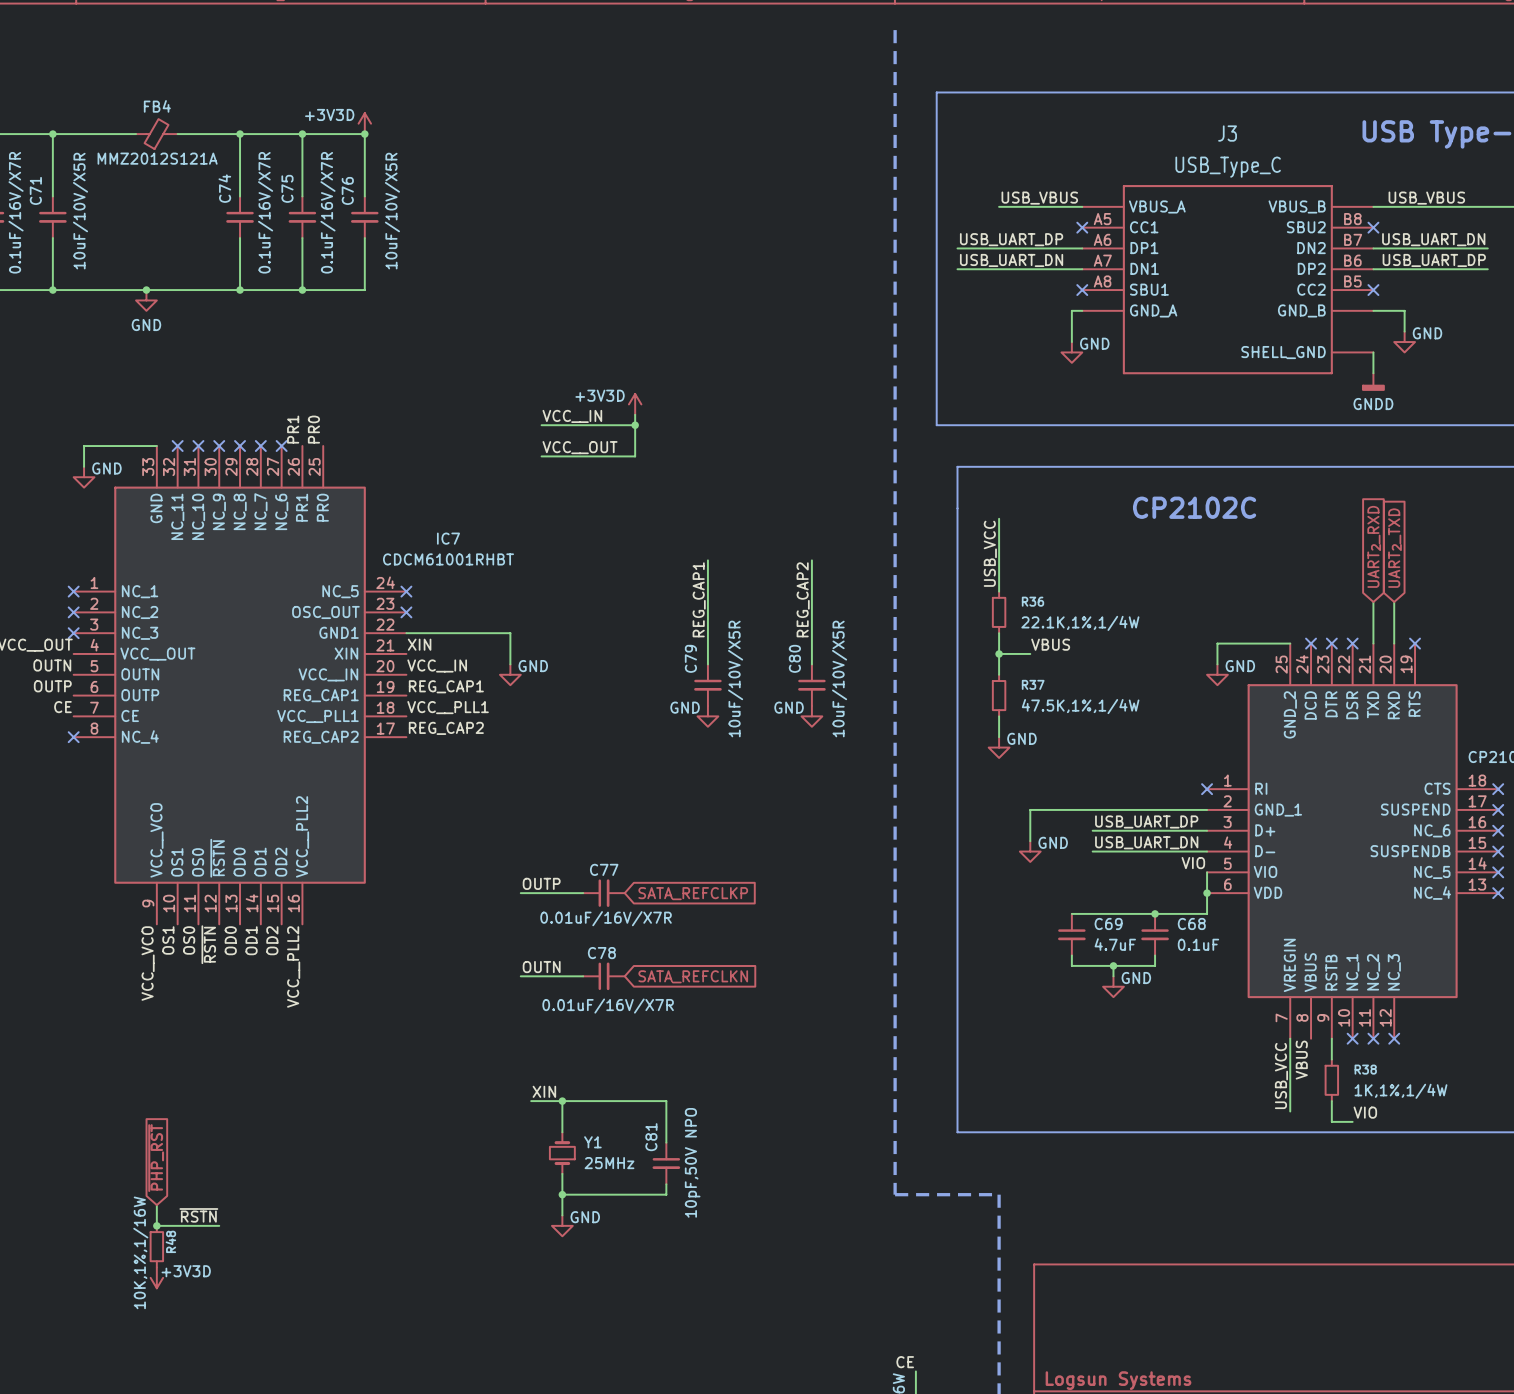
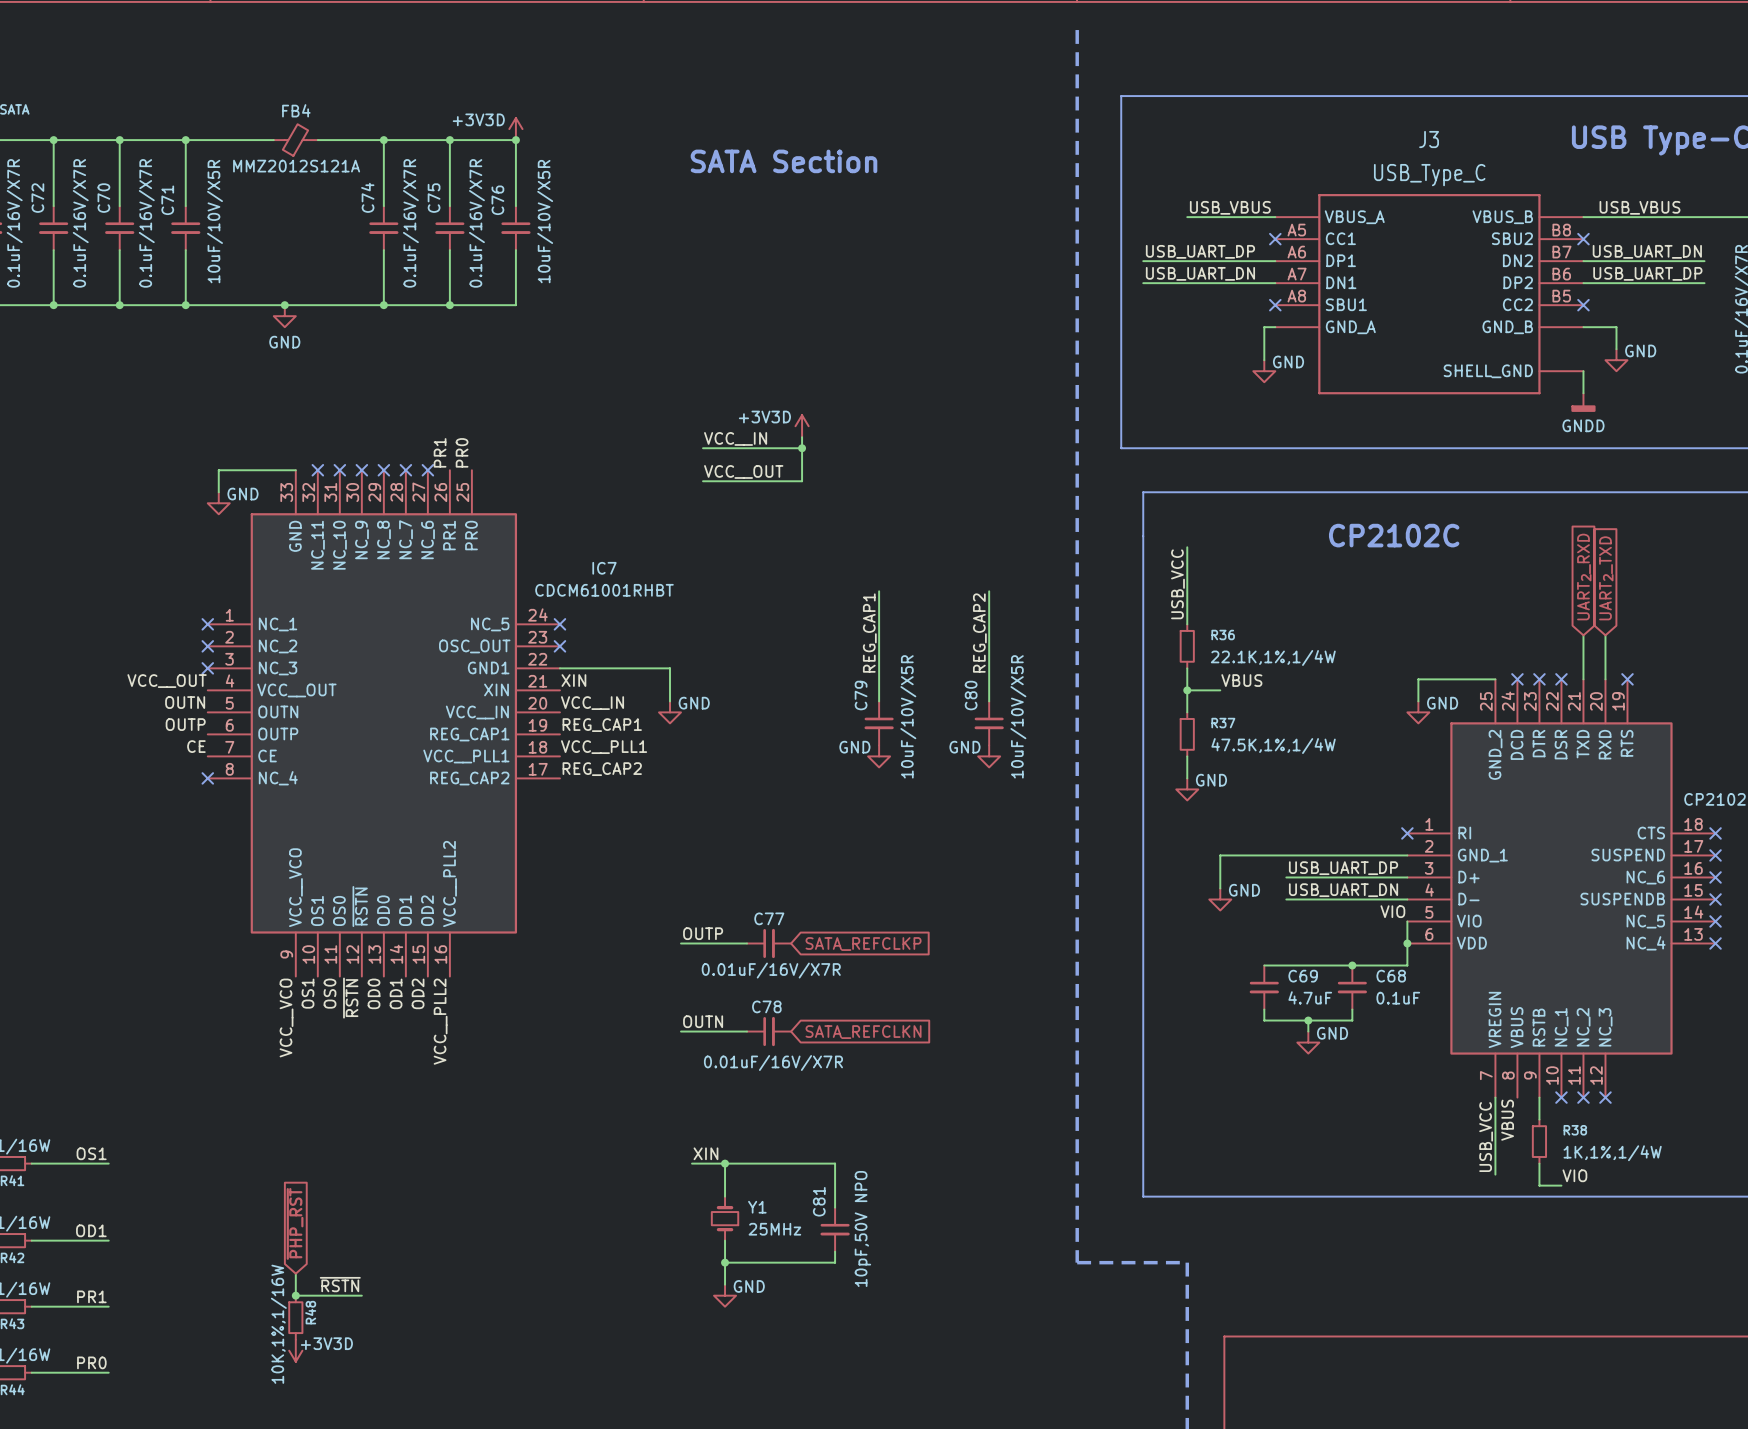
text: none -> SATA Section (783, 161)

